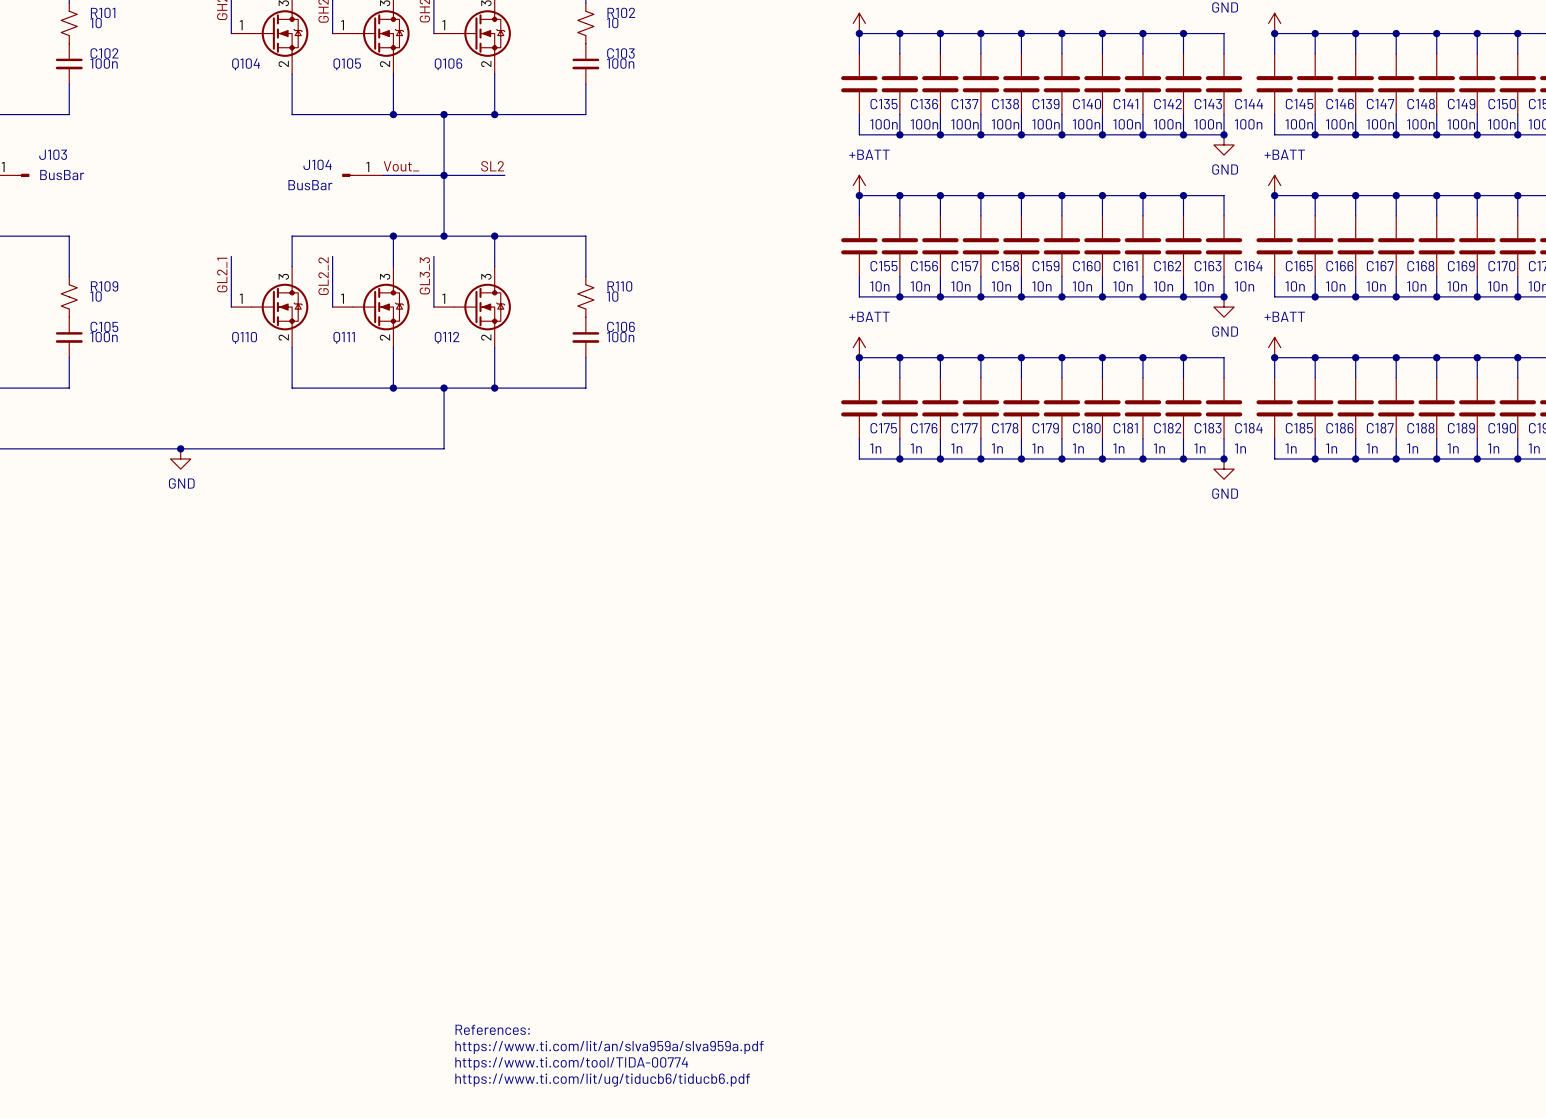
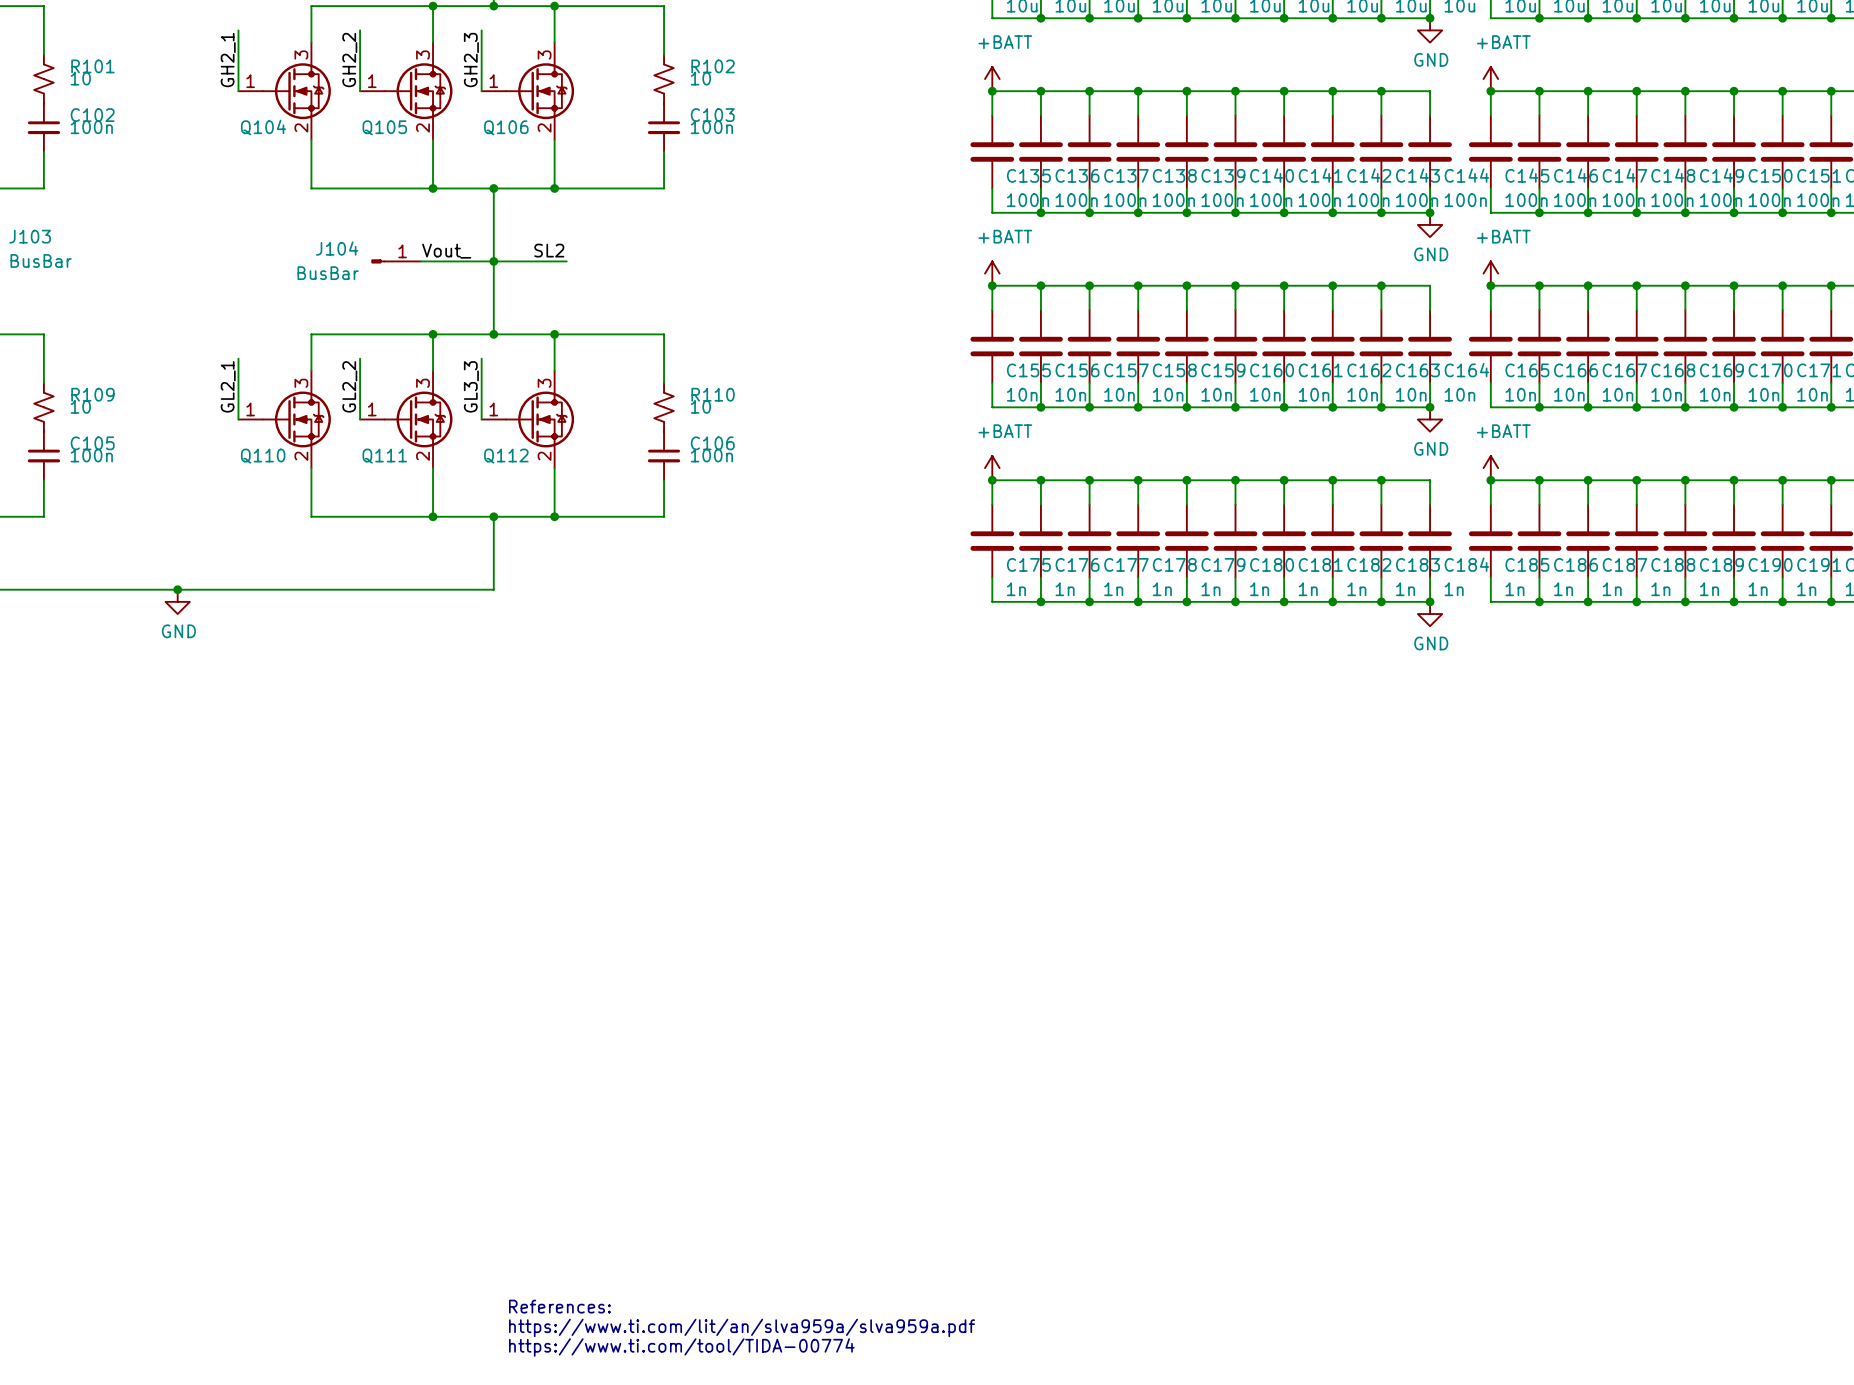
text: References: (492, 1029) -> none
text: https://www.ti.com/lit/an/slva959a/slva959a.pdf (609, 1047) -> References: (559, 1306)
text: https://www.ti.com/tool/TIDA-00774 (571, 1063) -> https://www.ti.com/lit/an/slva959a/slva959a.pdf (742, 1327)
text: https://www.ti.com/lit/ug/tiducb6/tiducb6.pdf (602, 1080) -> https://www.ti.com/tool/TIDA-00774 (681, 1347)

